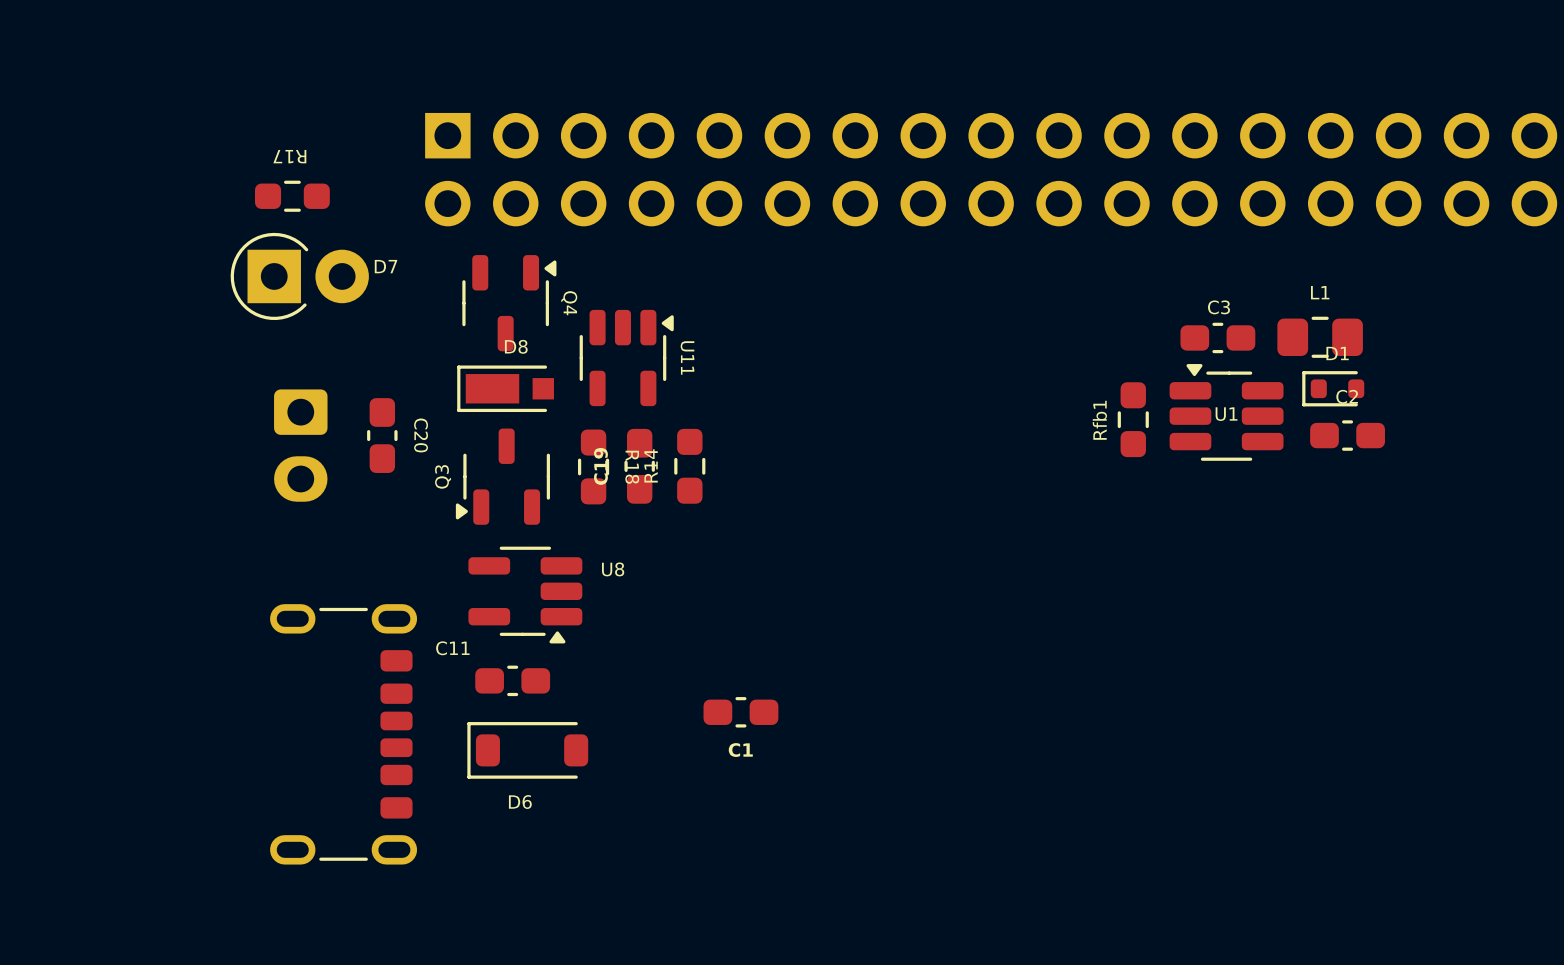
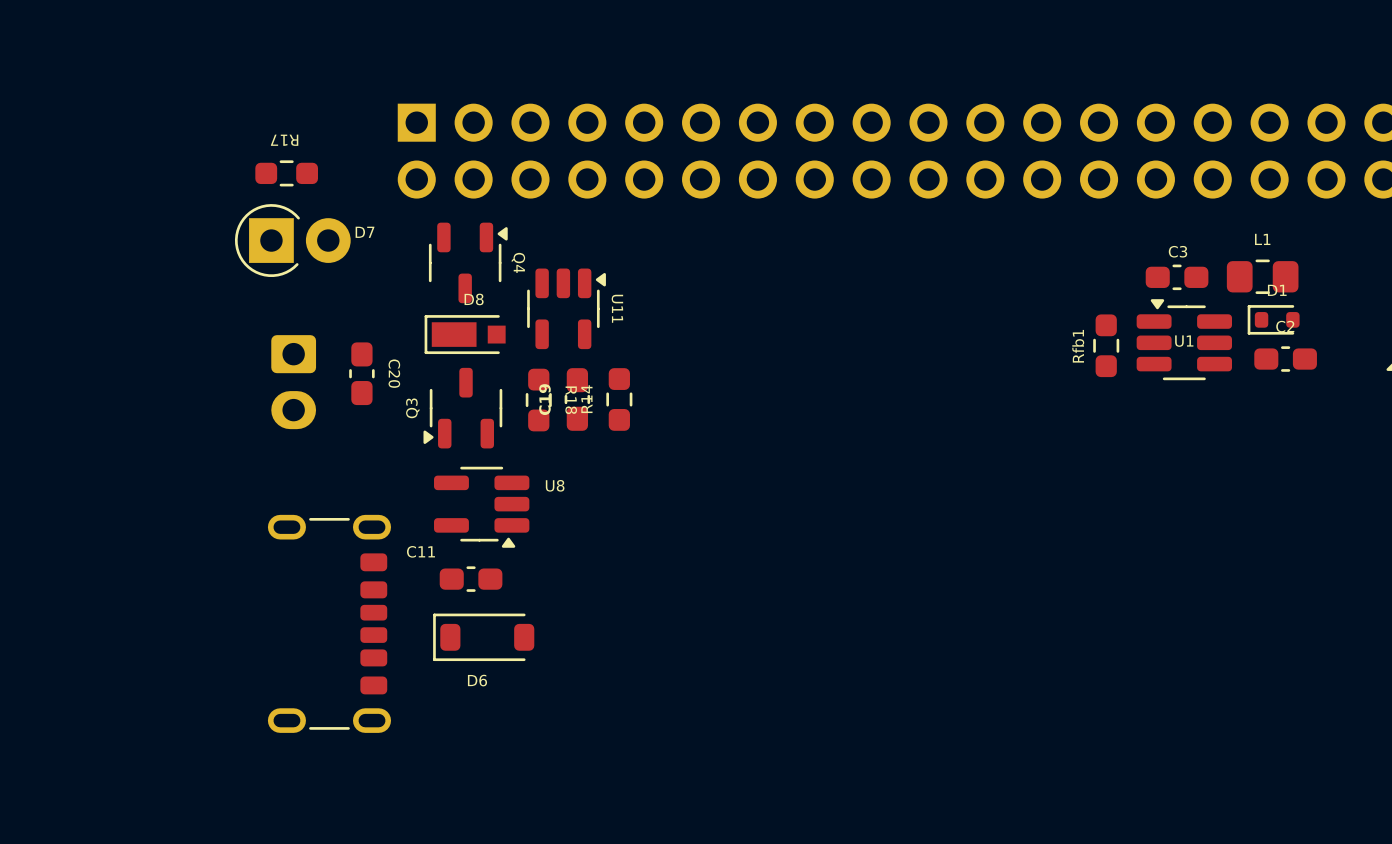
C3 position: (1217, 337) -> (1177, 277)
L1 position: (1320, 337) -> (1262, 276)
D1 position: (1333, 388) -> (1273, 319)
U1 position: (1226, 412) -> (1184, 339)
Rfb1 position: (1133, 419) -> (1106, 345)
C2 position: (1347, 435) -> (1285, 359)
C1: (740, 712) -> none

